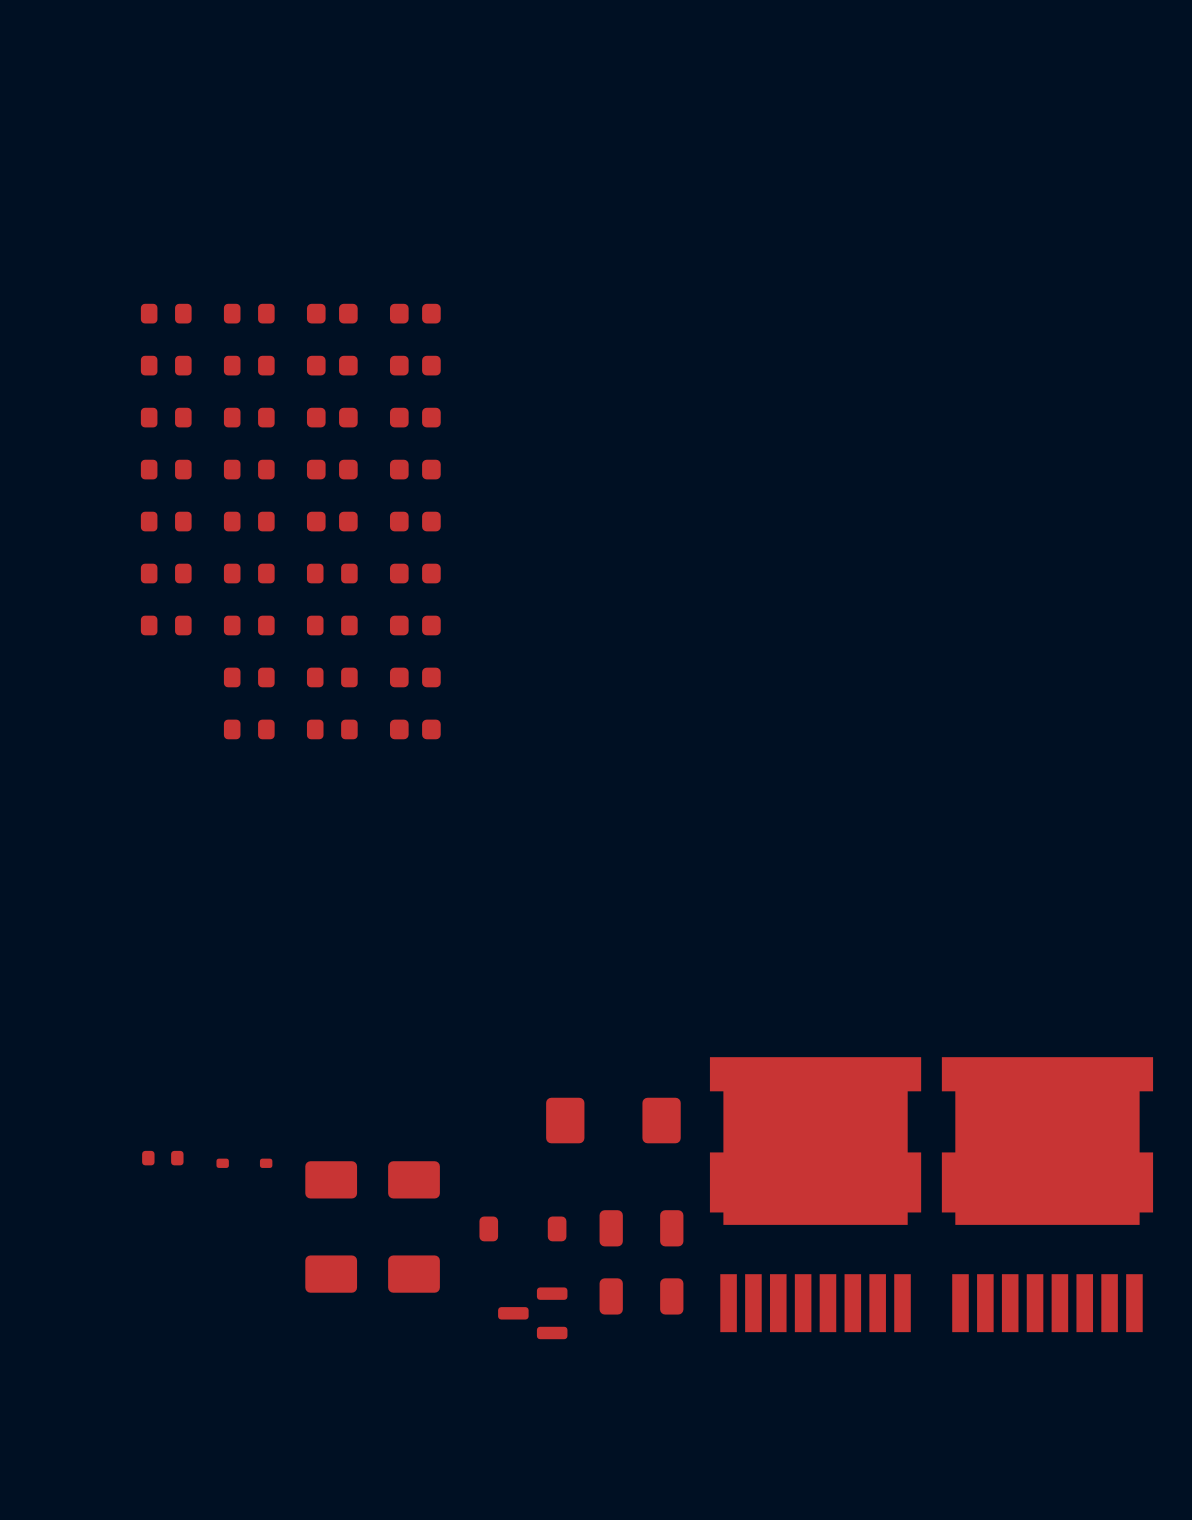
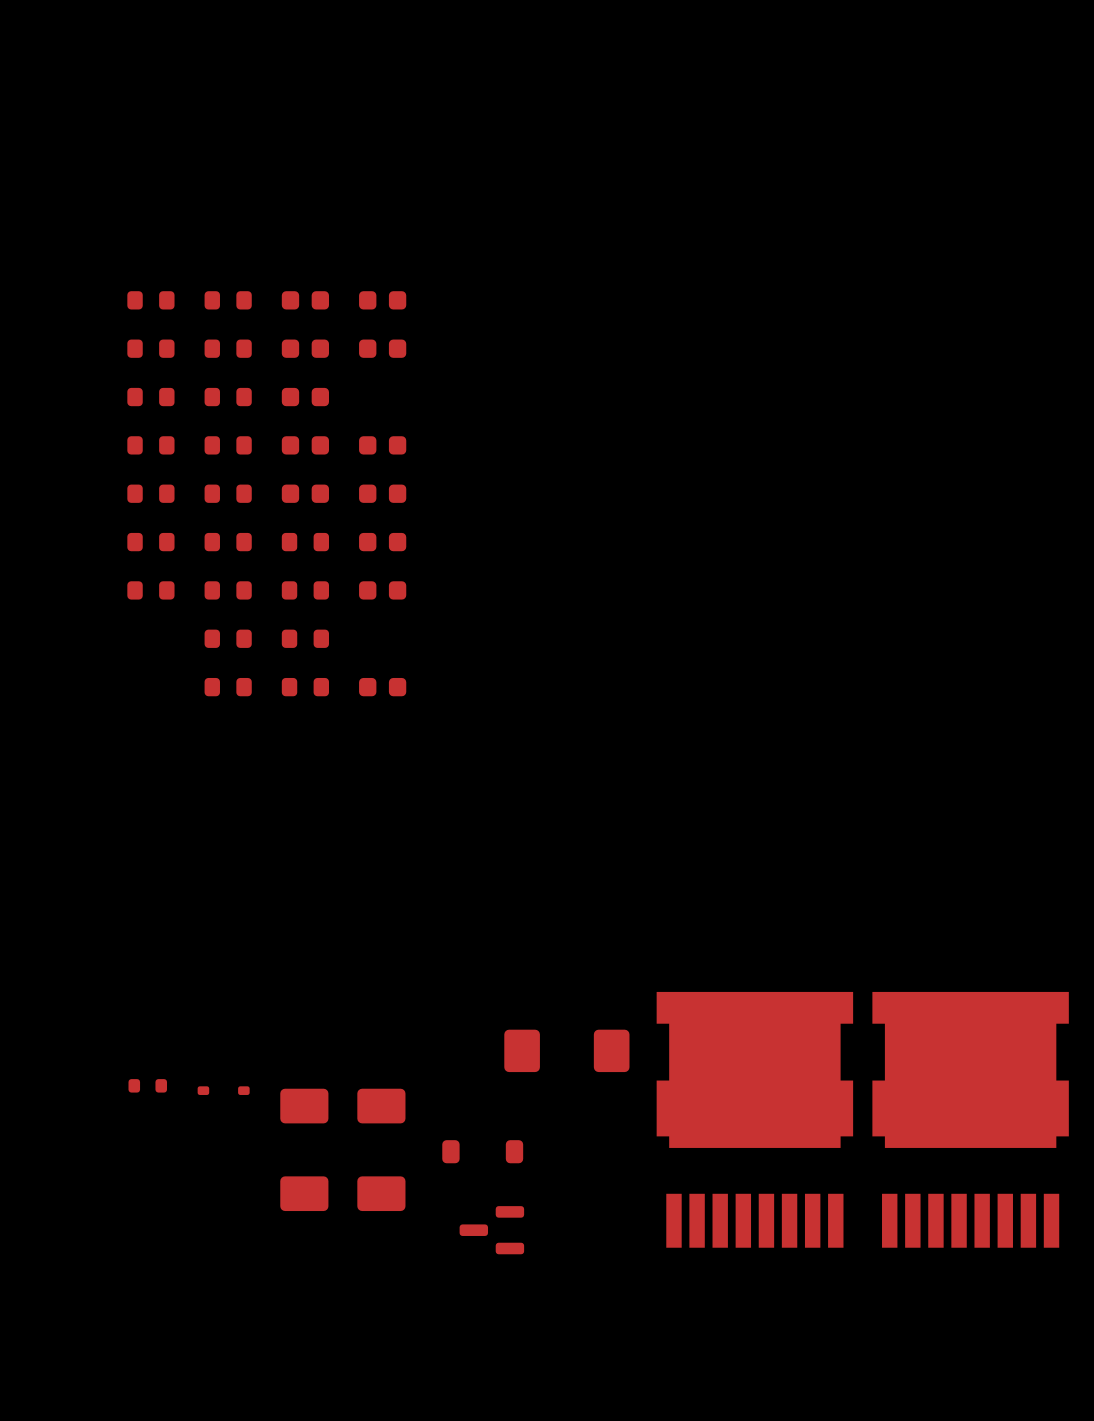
part: (415, 417) -> none
part: (415, 677) -> none
part: (641, 1228) -> none
part: (641, 1296) -> none

